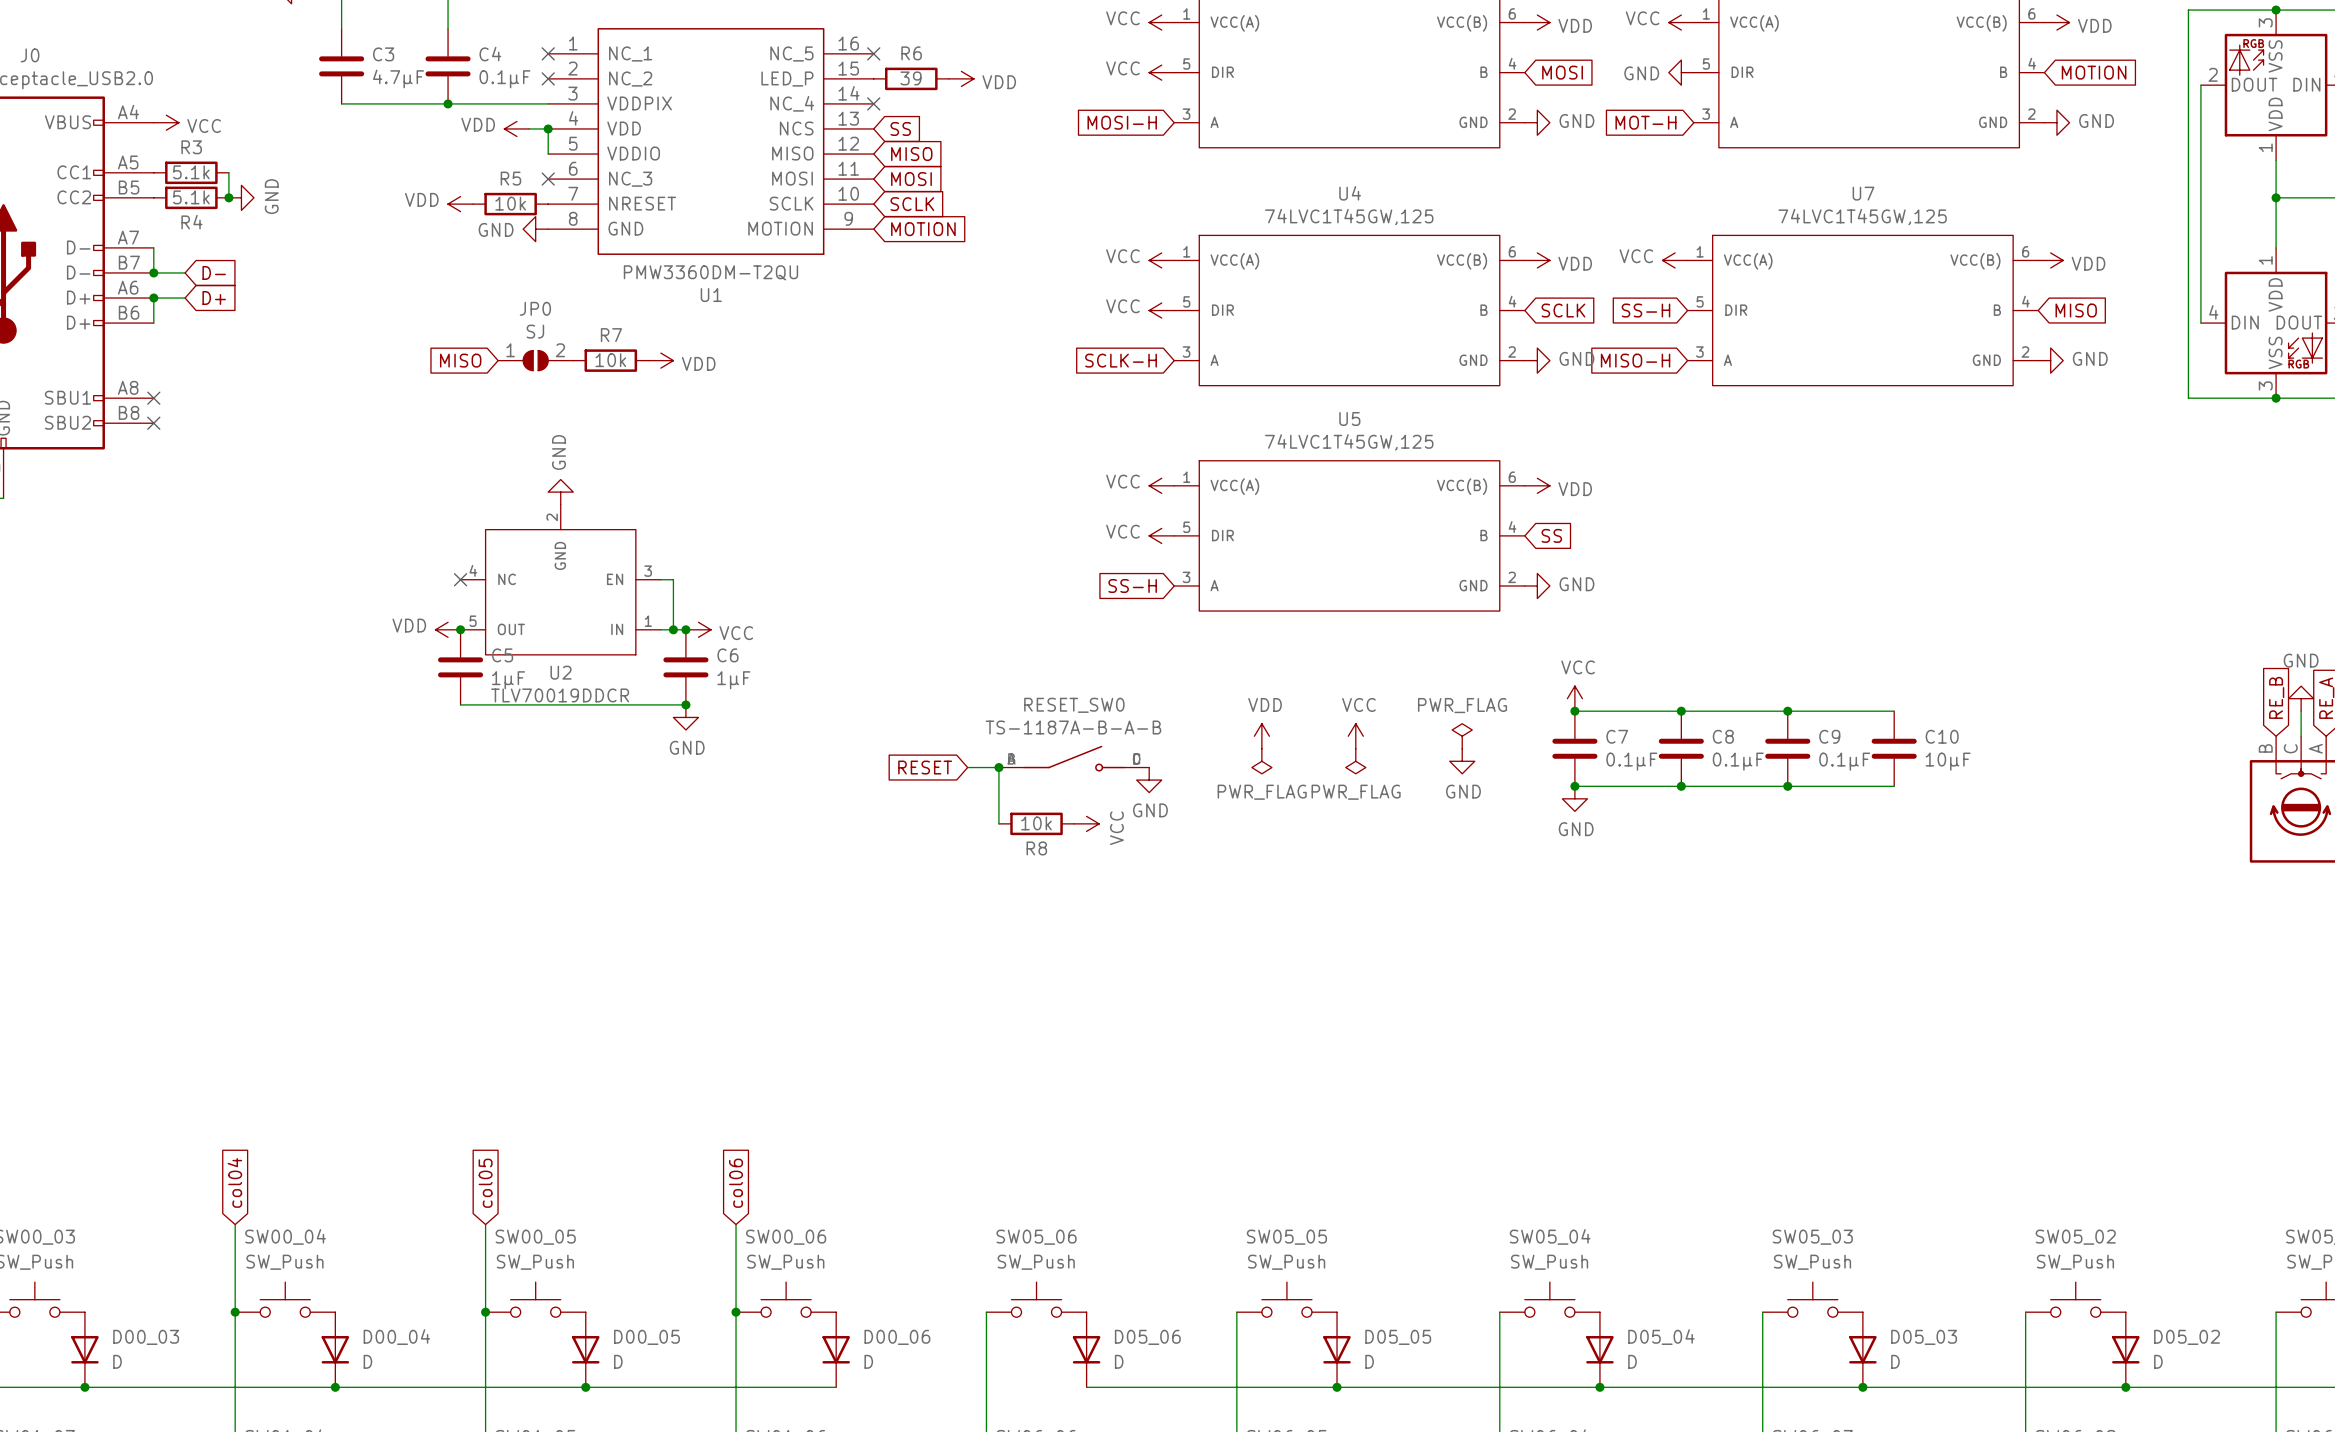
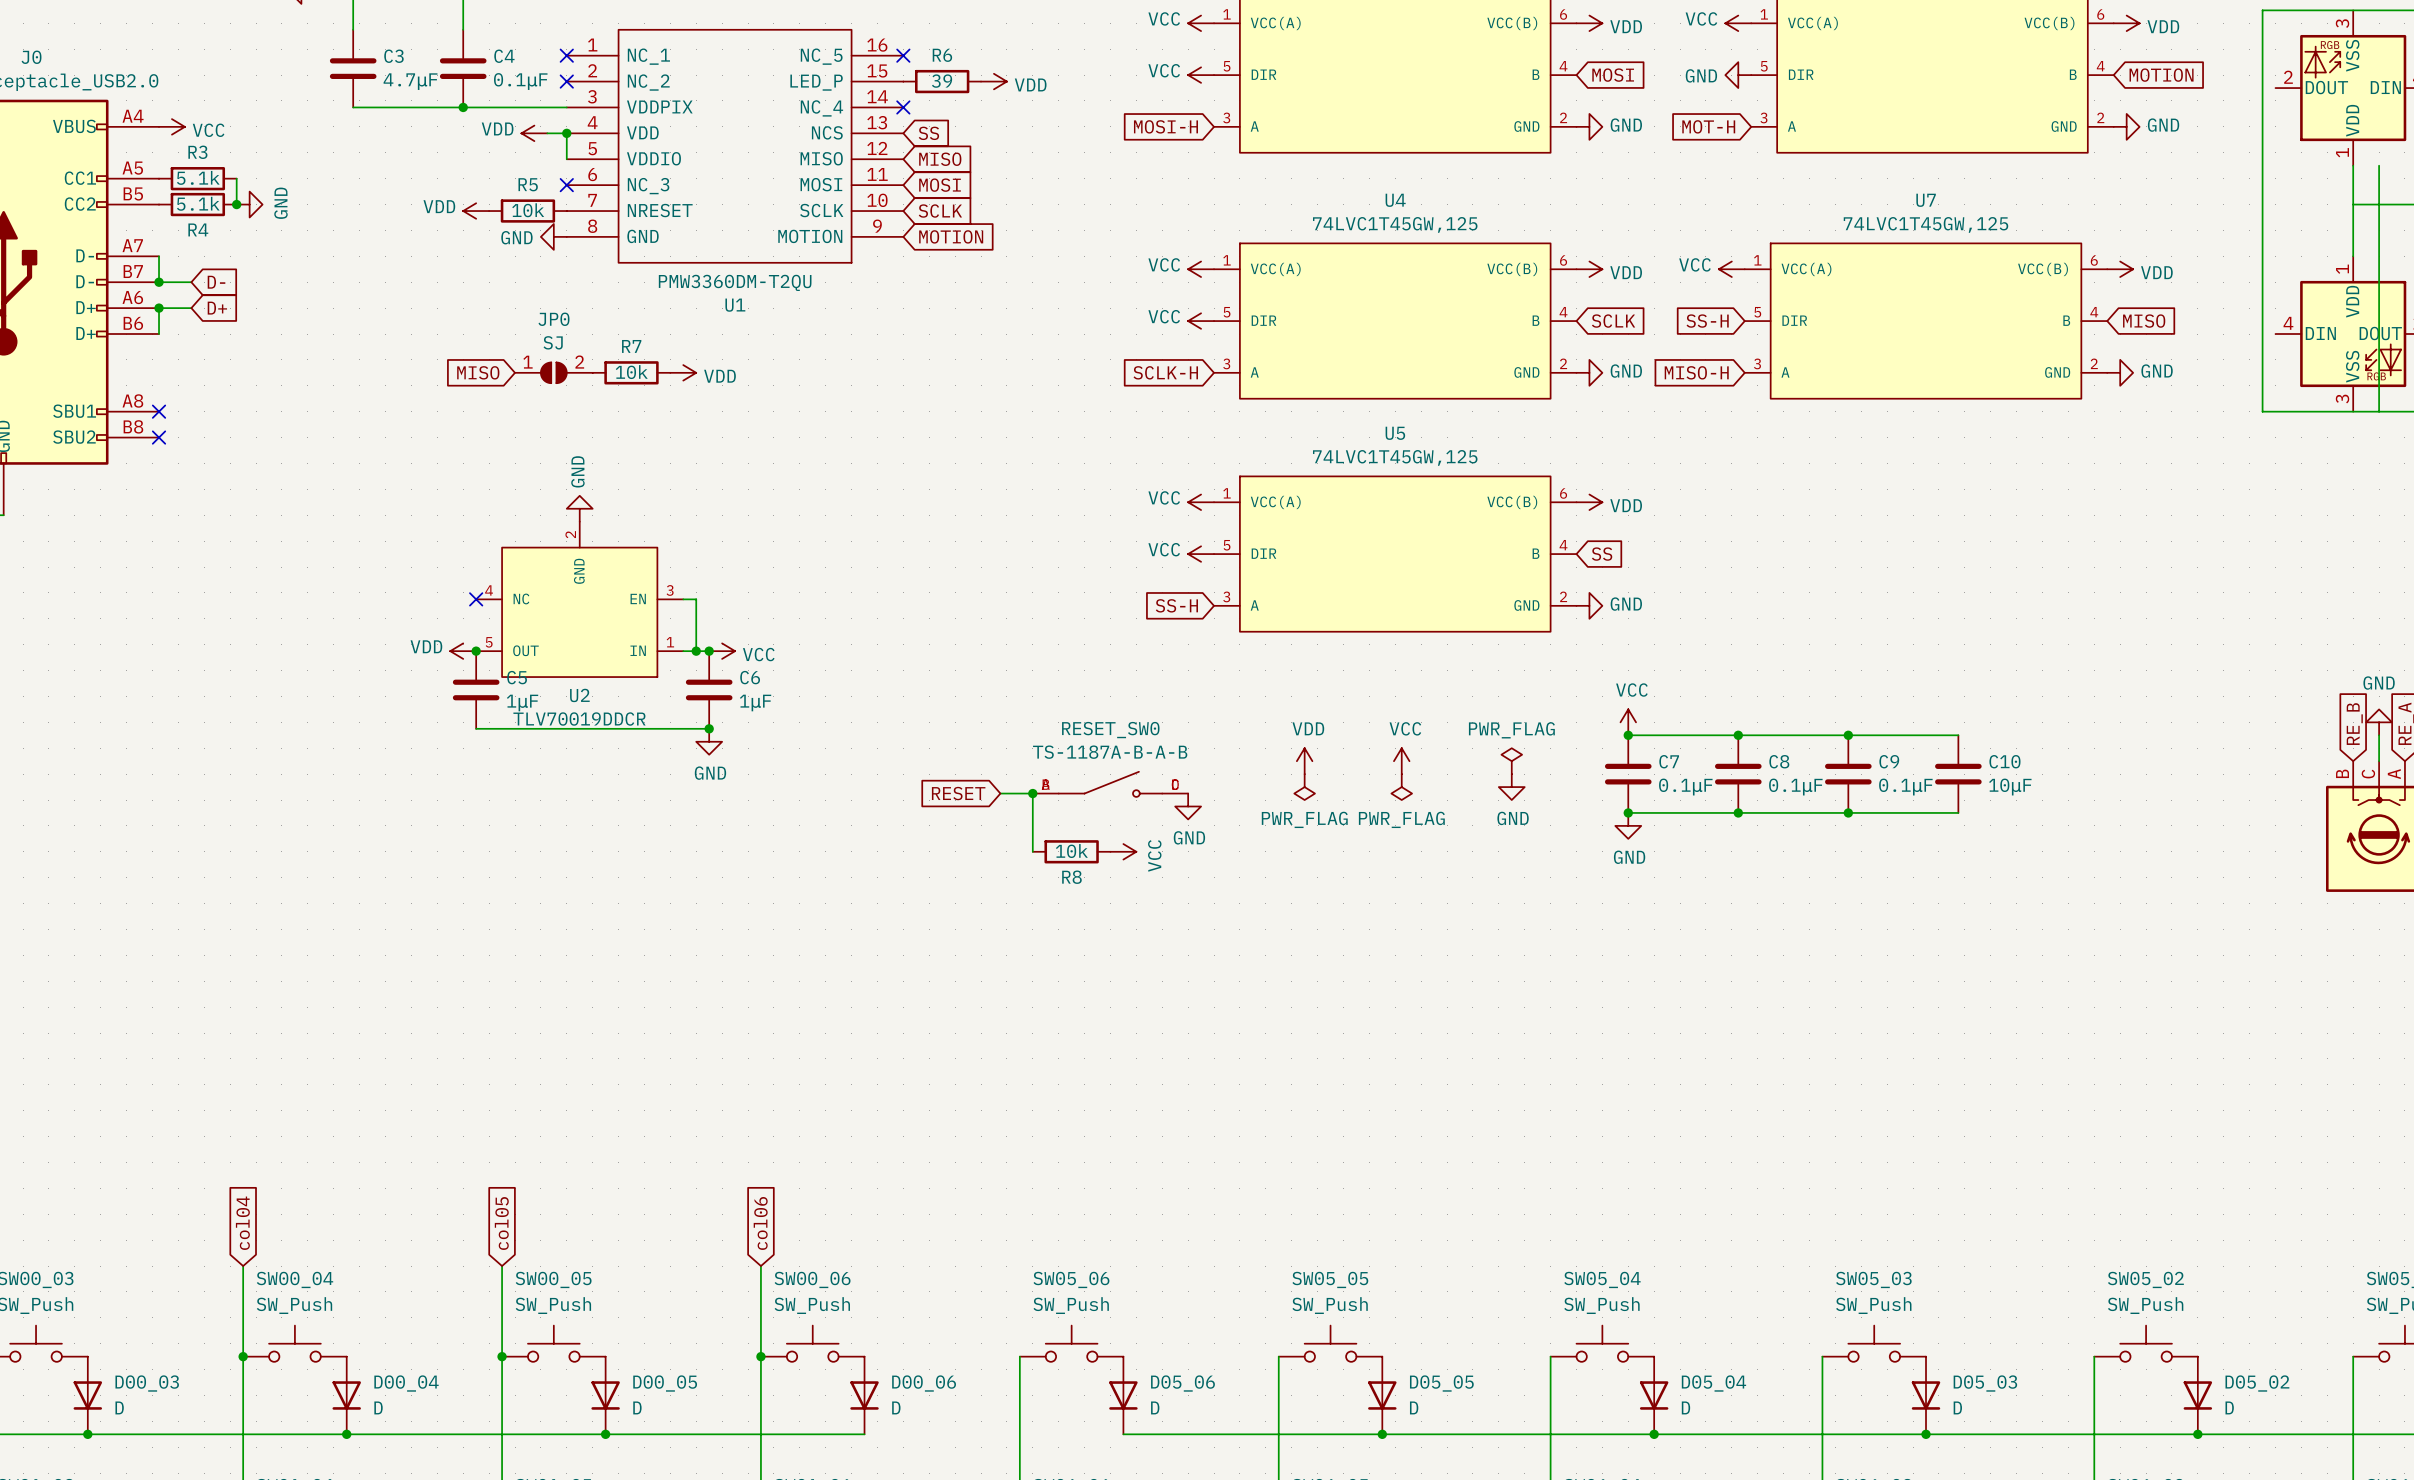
junction: (2276, 10) -> none
wire: (2200, 85) (2200, 323) -> (2379, 165) (2379, 411)
junction: (2276, 197) -> none
junction: (2276, 398) -> none

